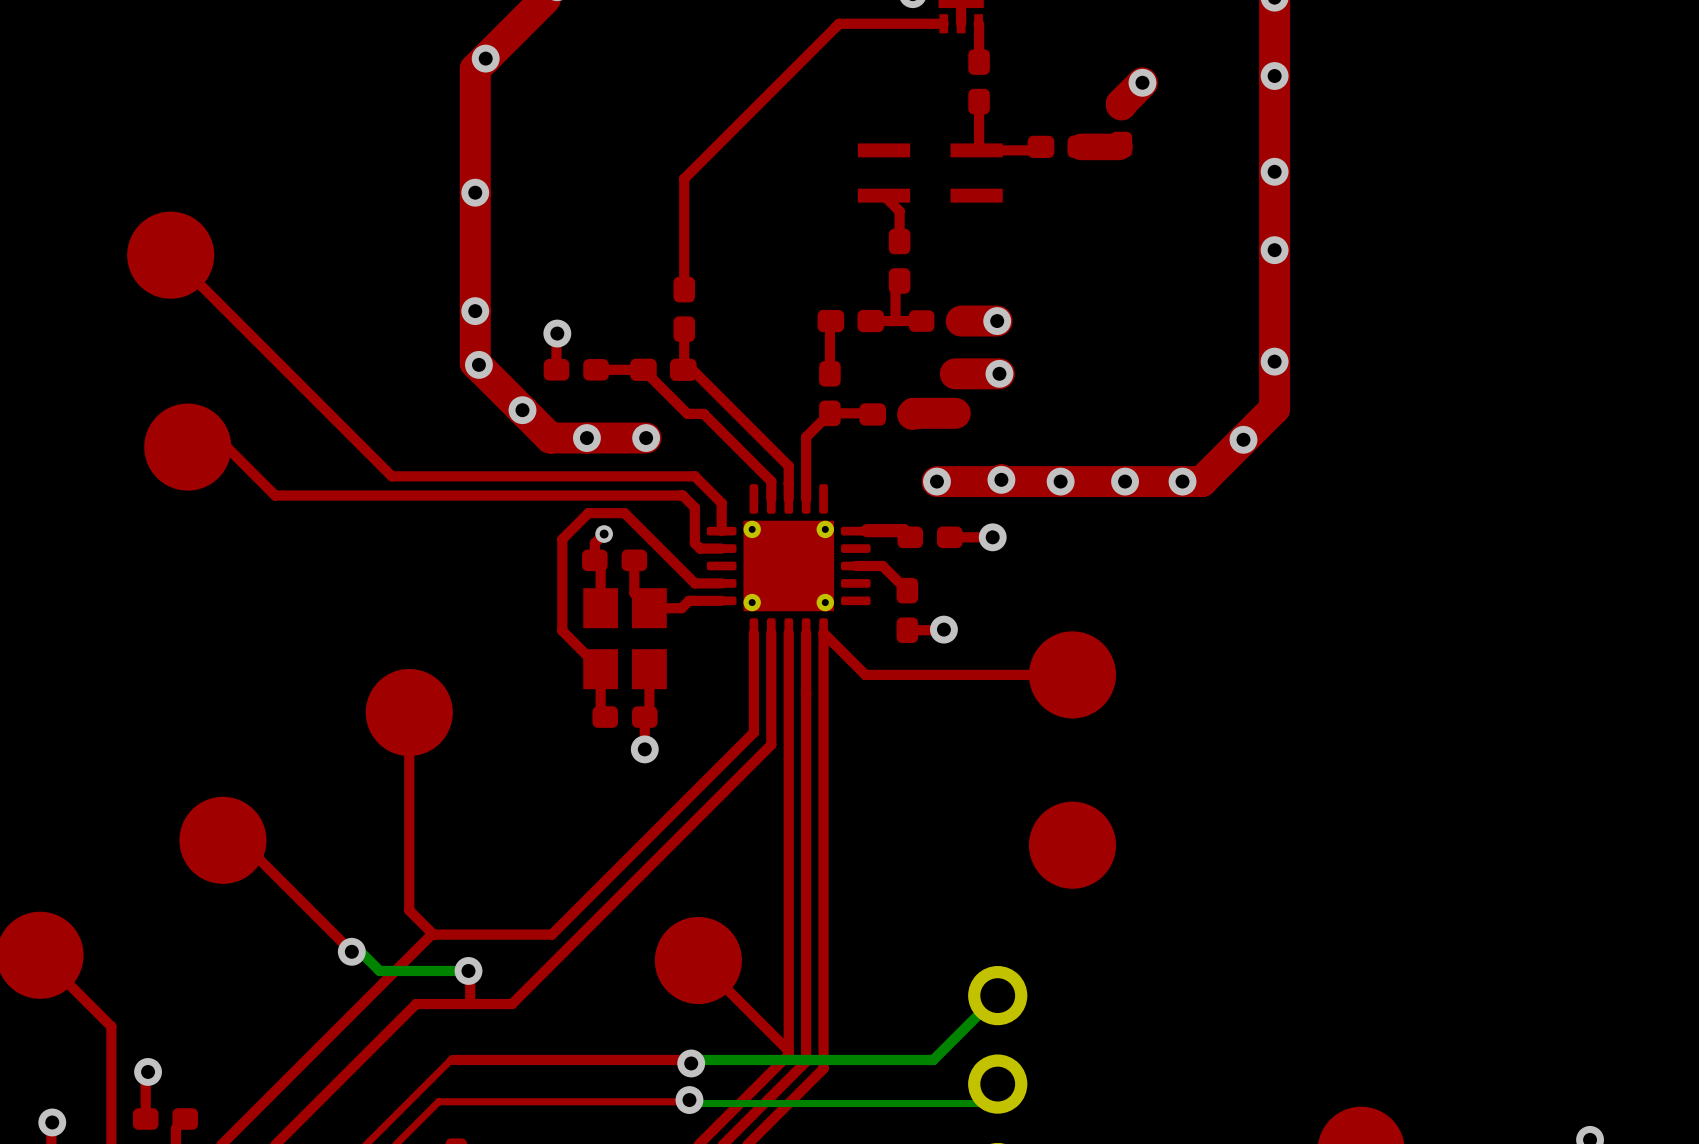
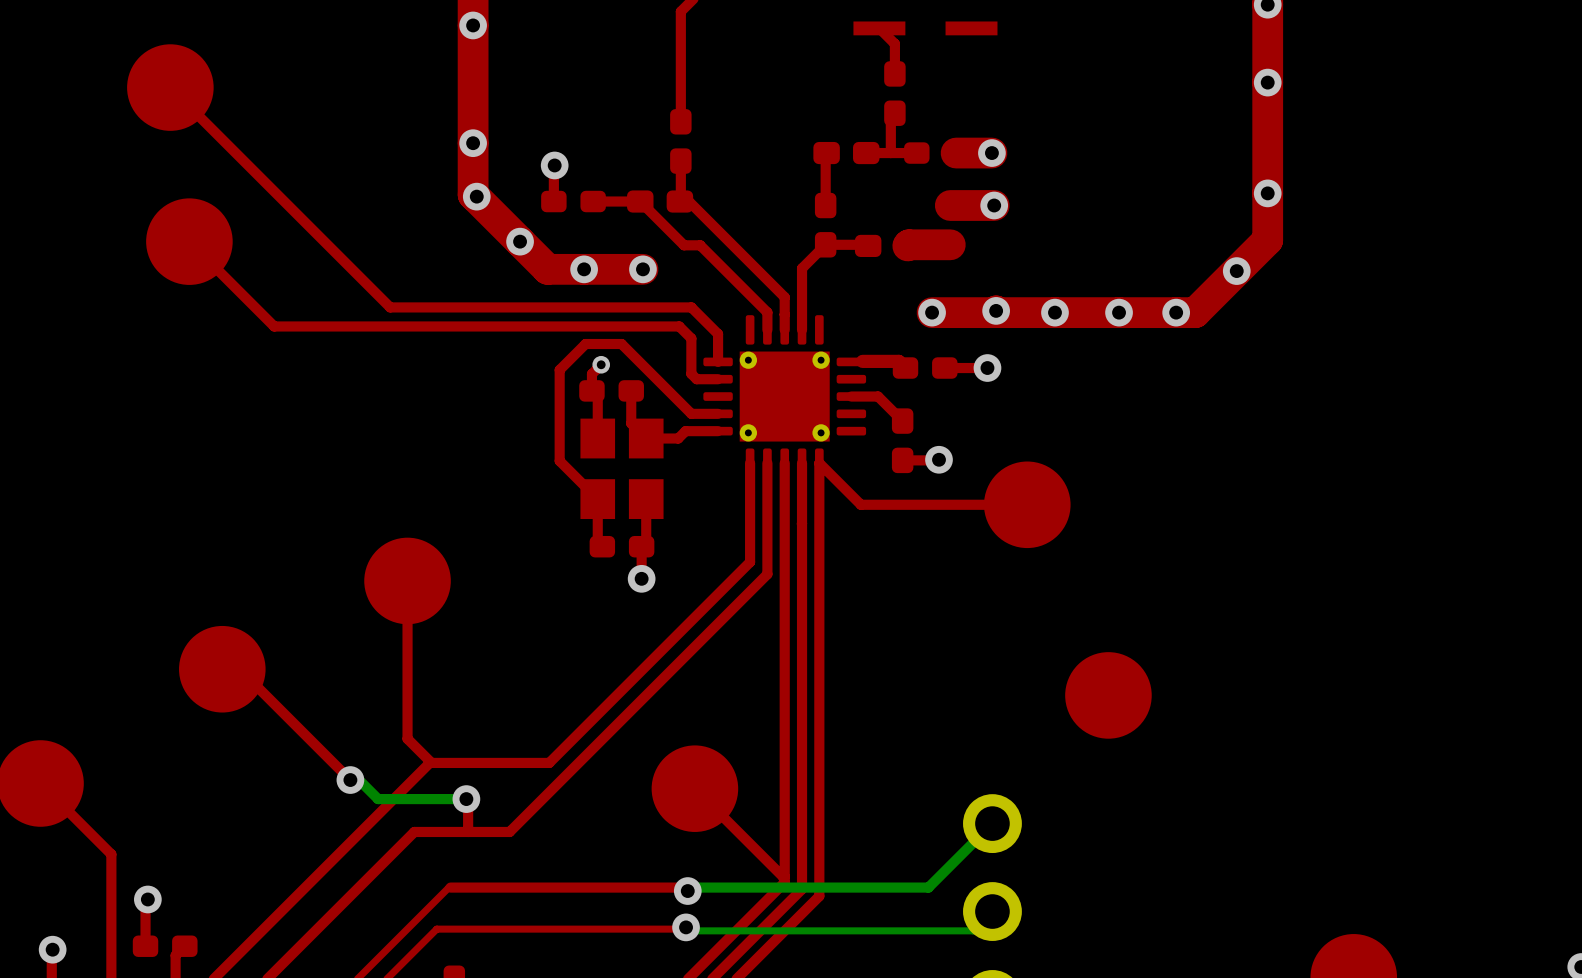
part position: (187, 447) -> (189, 241)
part position: (1072, 674) -> (1027, 504)
part position: (409, 712) -> (407, 580)
part position: (1072, 845) -> (1108, 695)

